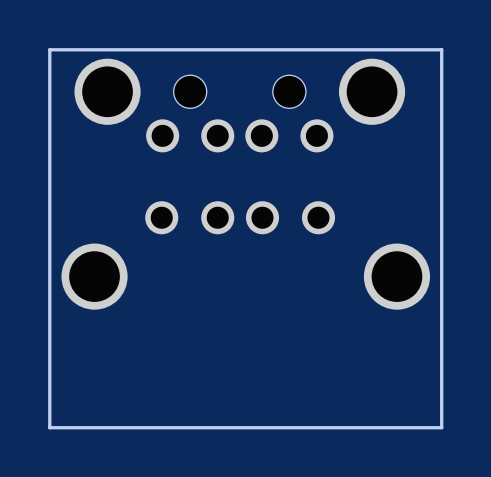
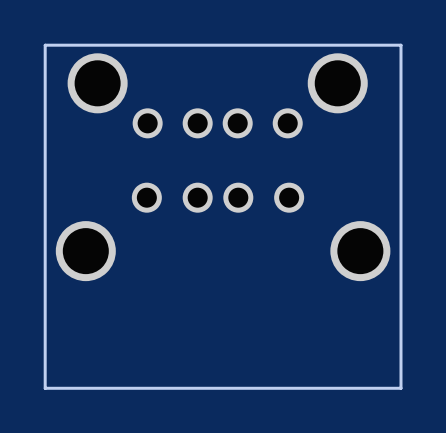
part footprint: [74, 58, 406, 153] -> [67, 53, 368, 139]

